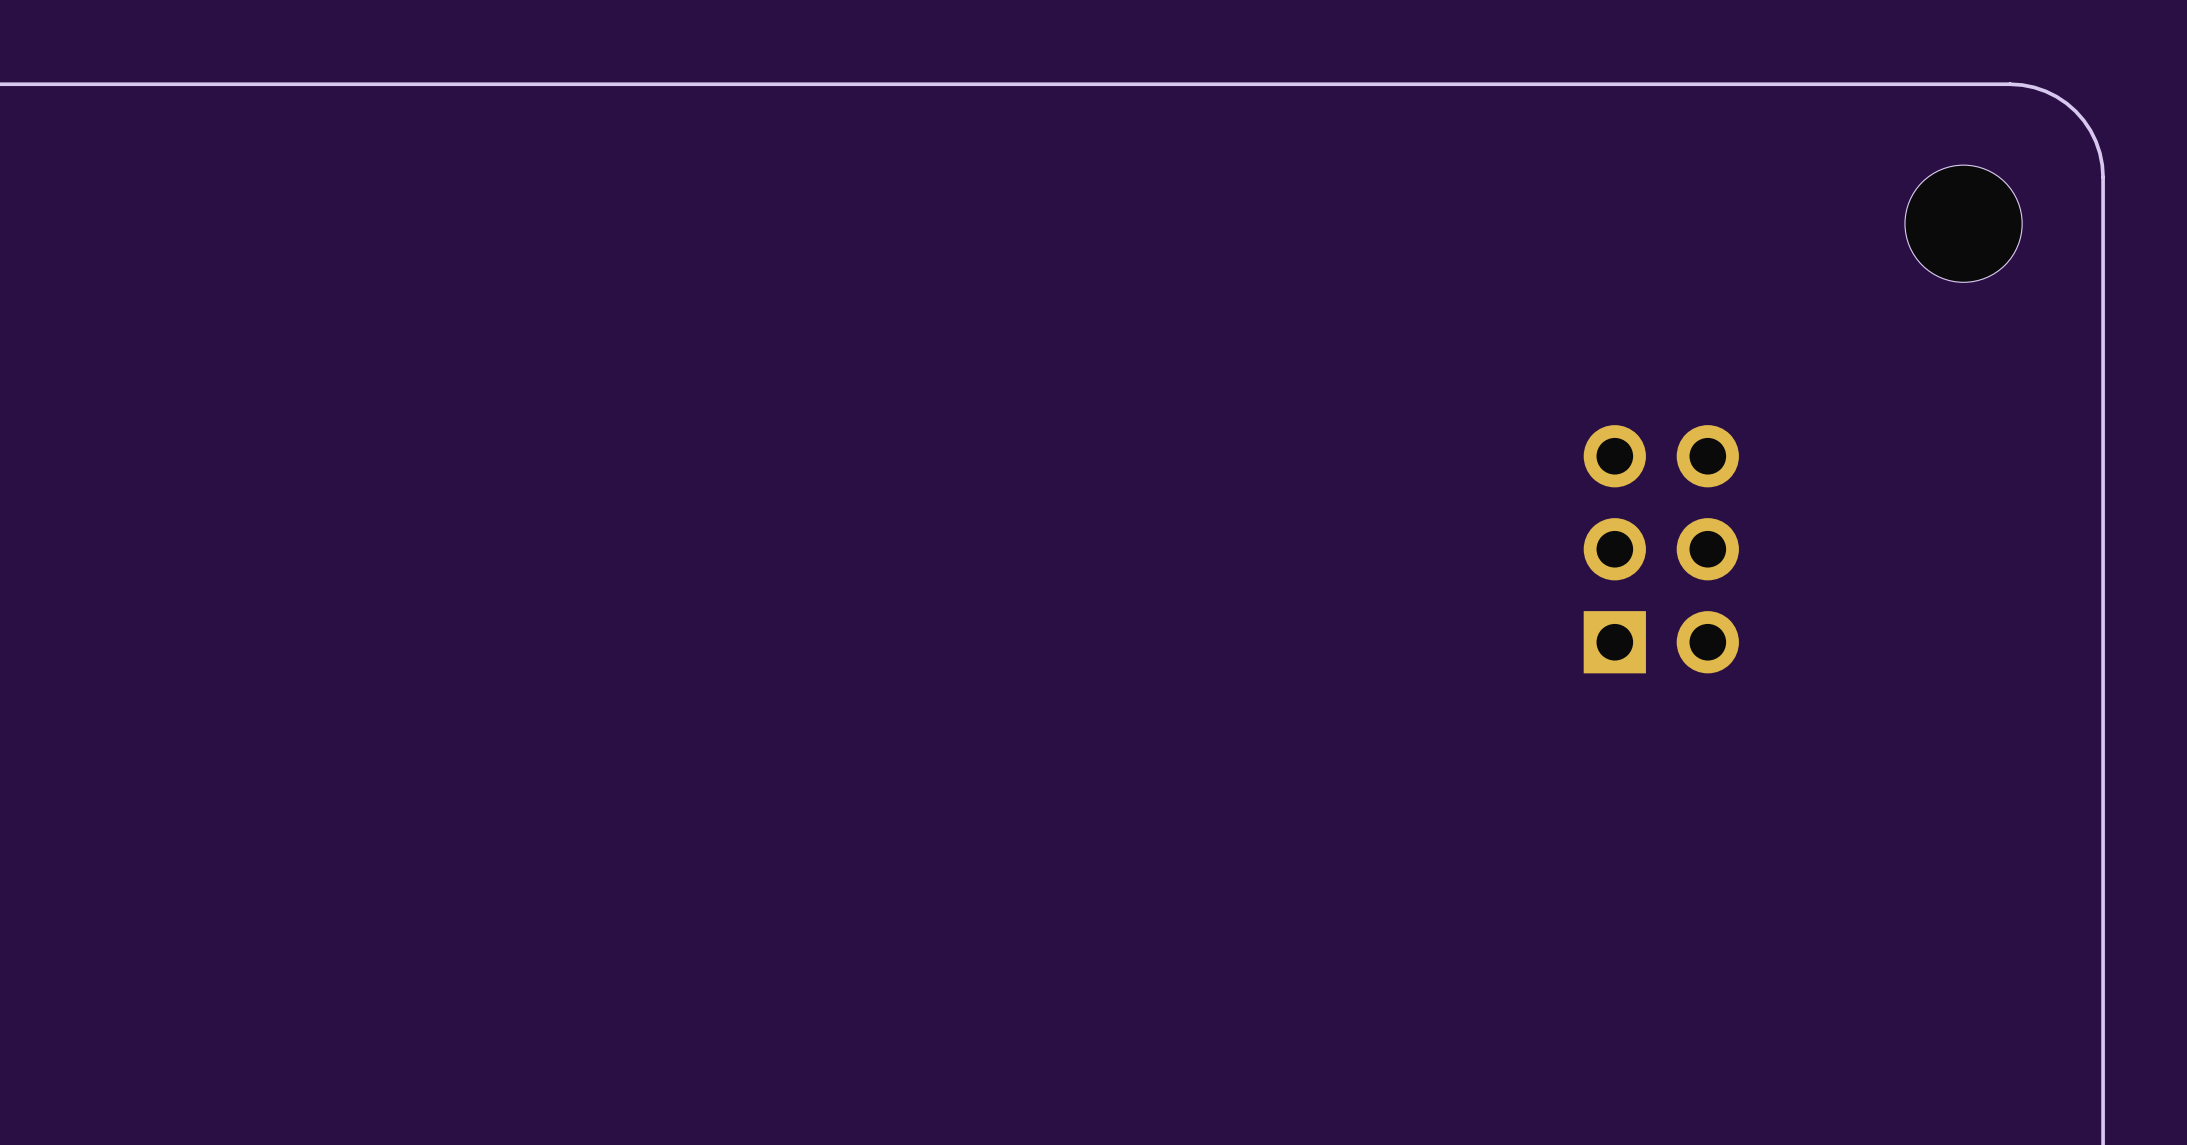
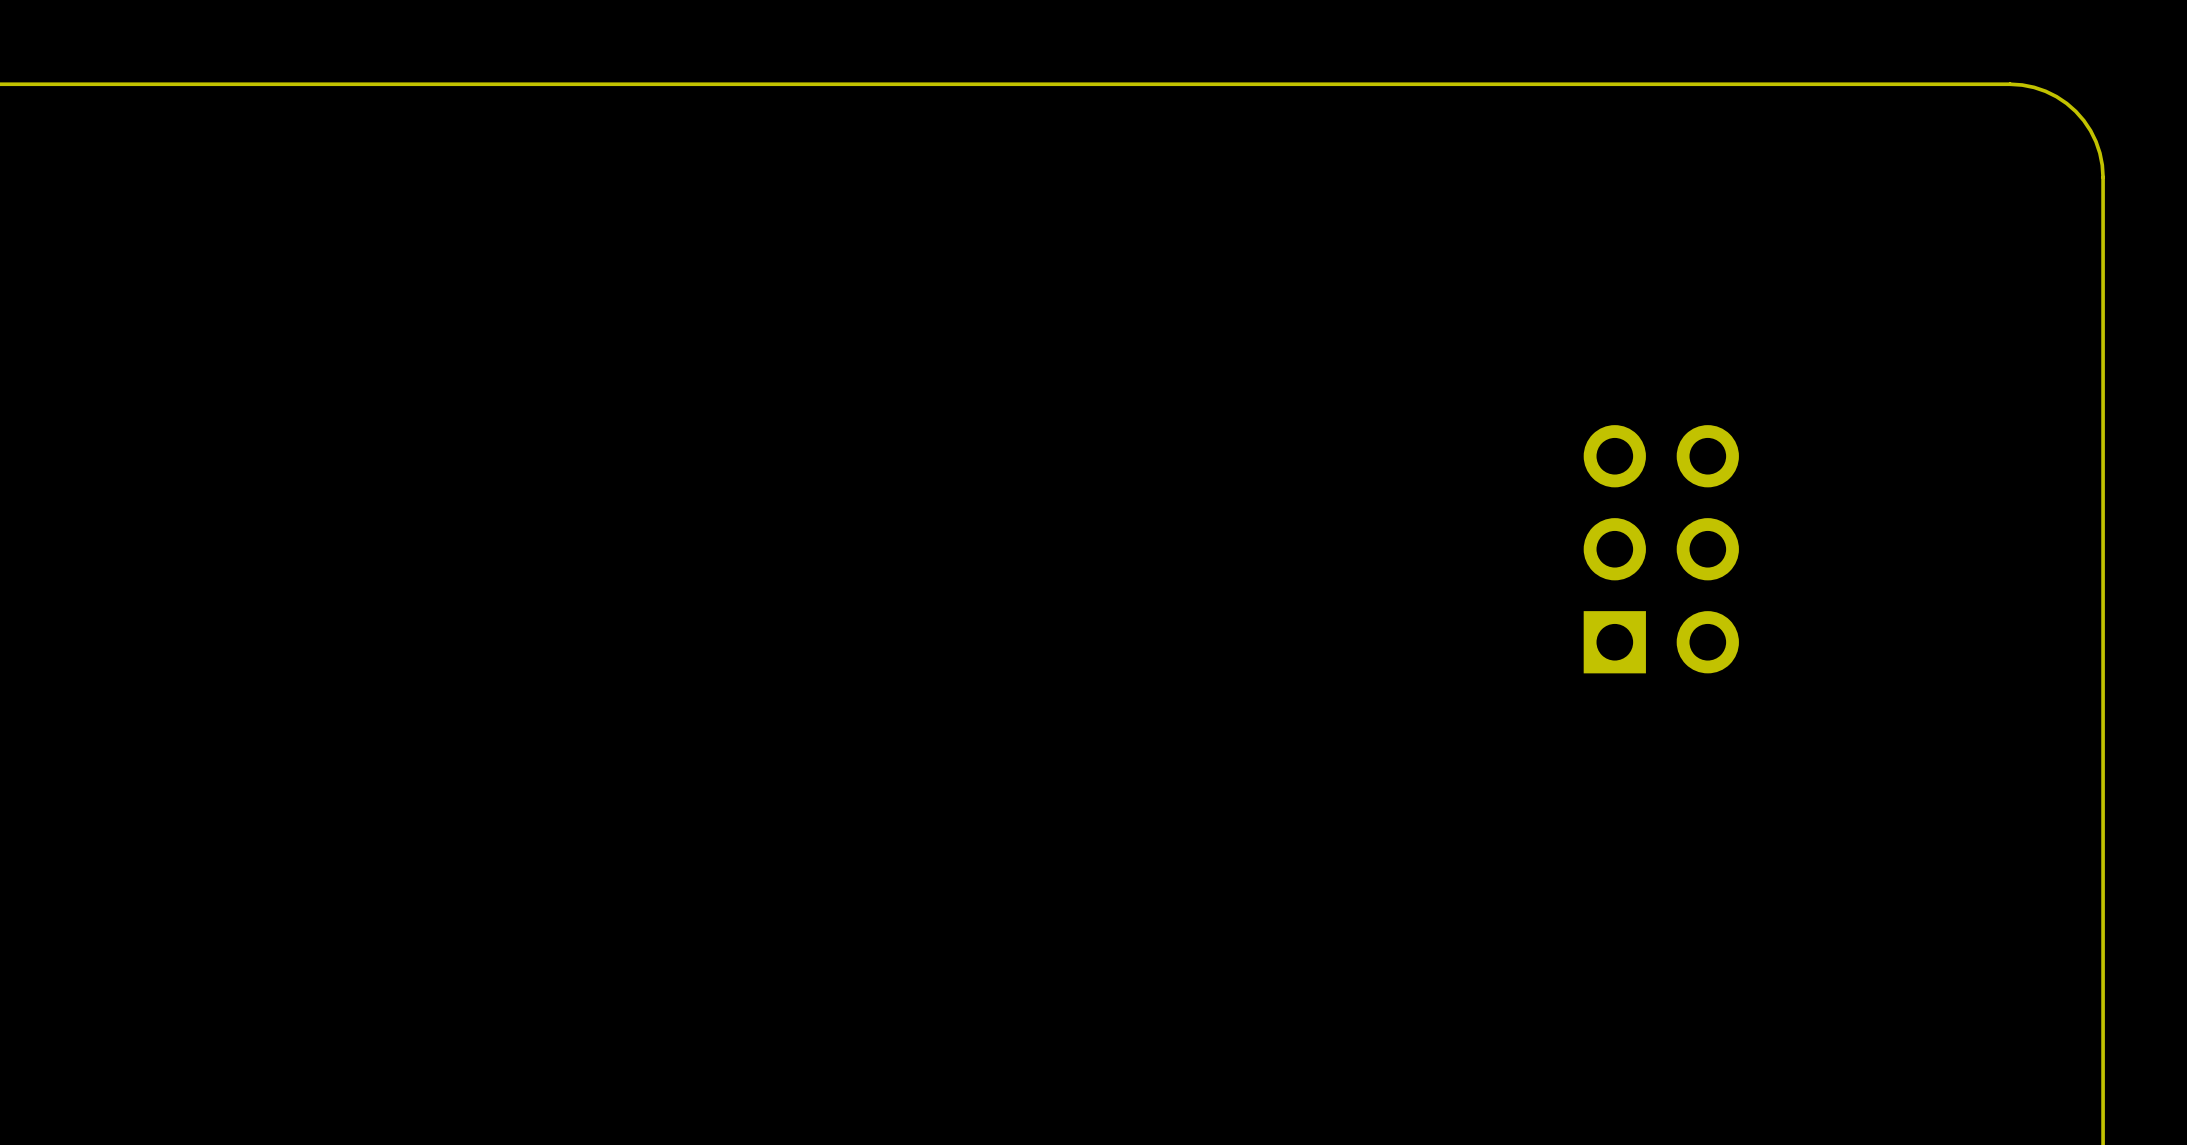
part: (1963, 223) -> none

